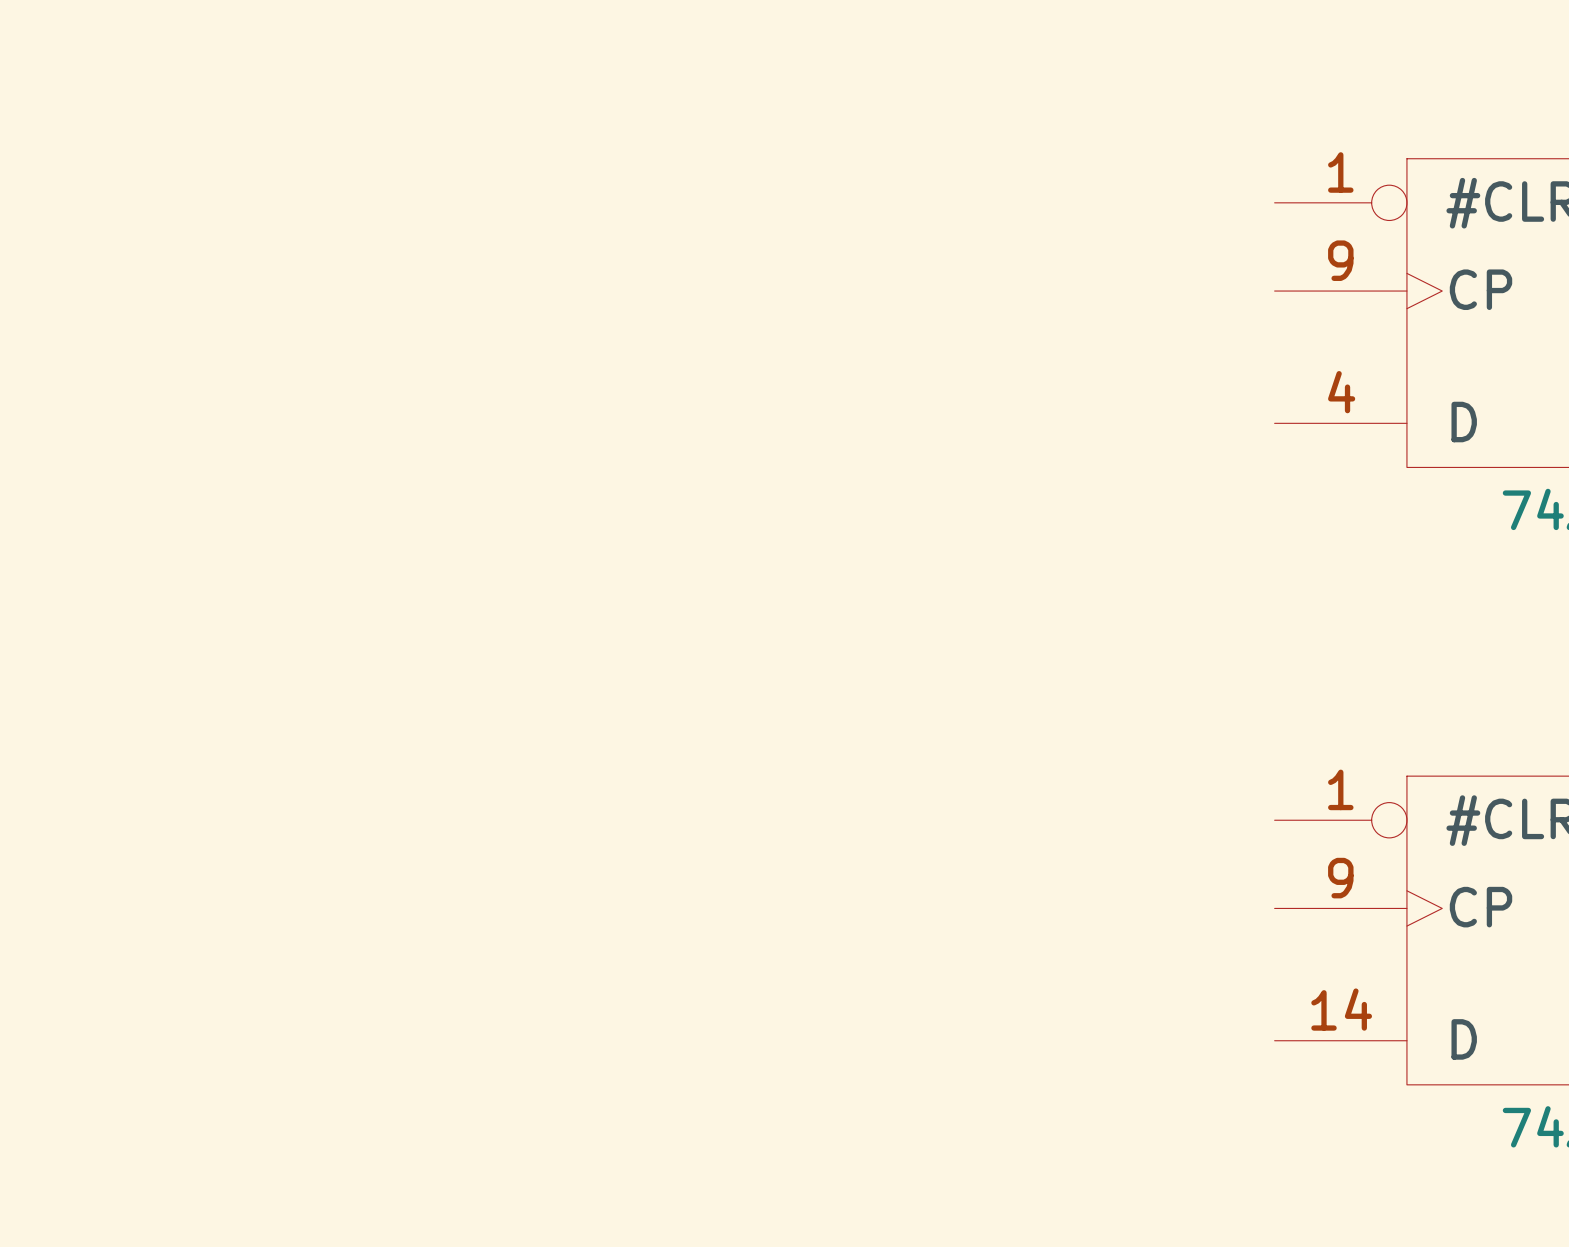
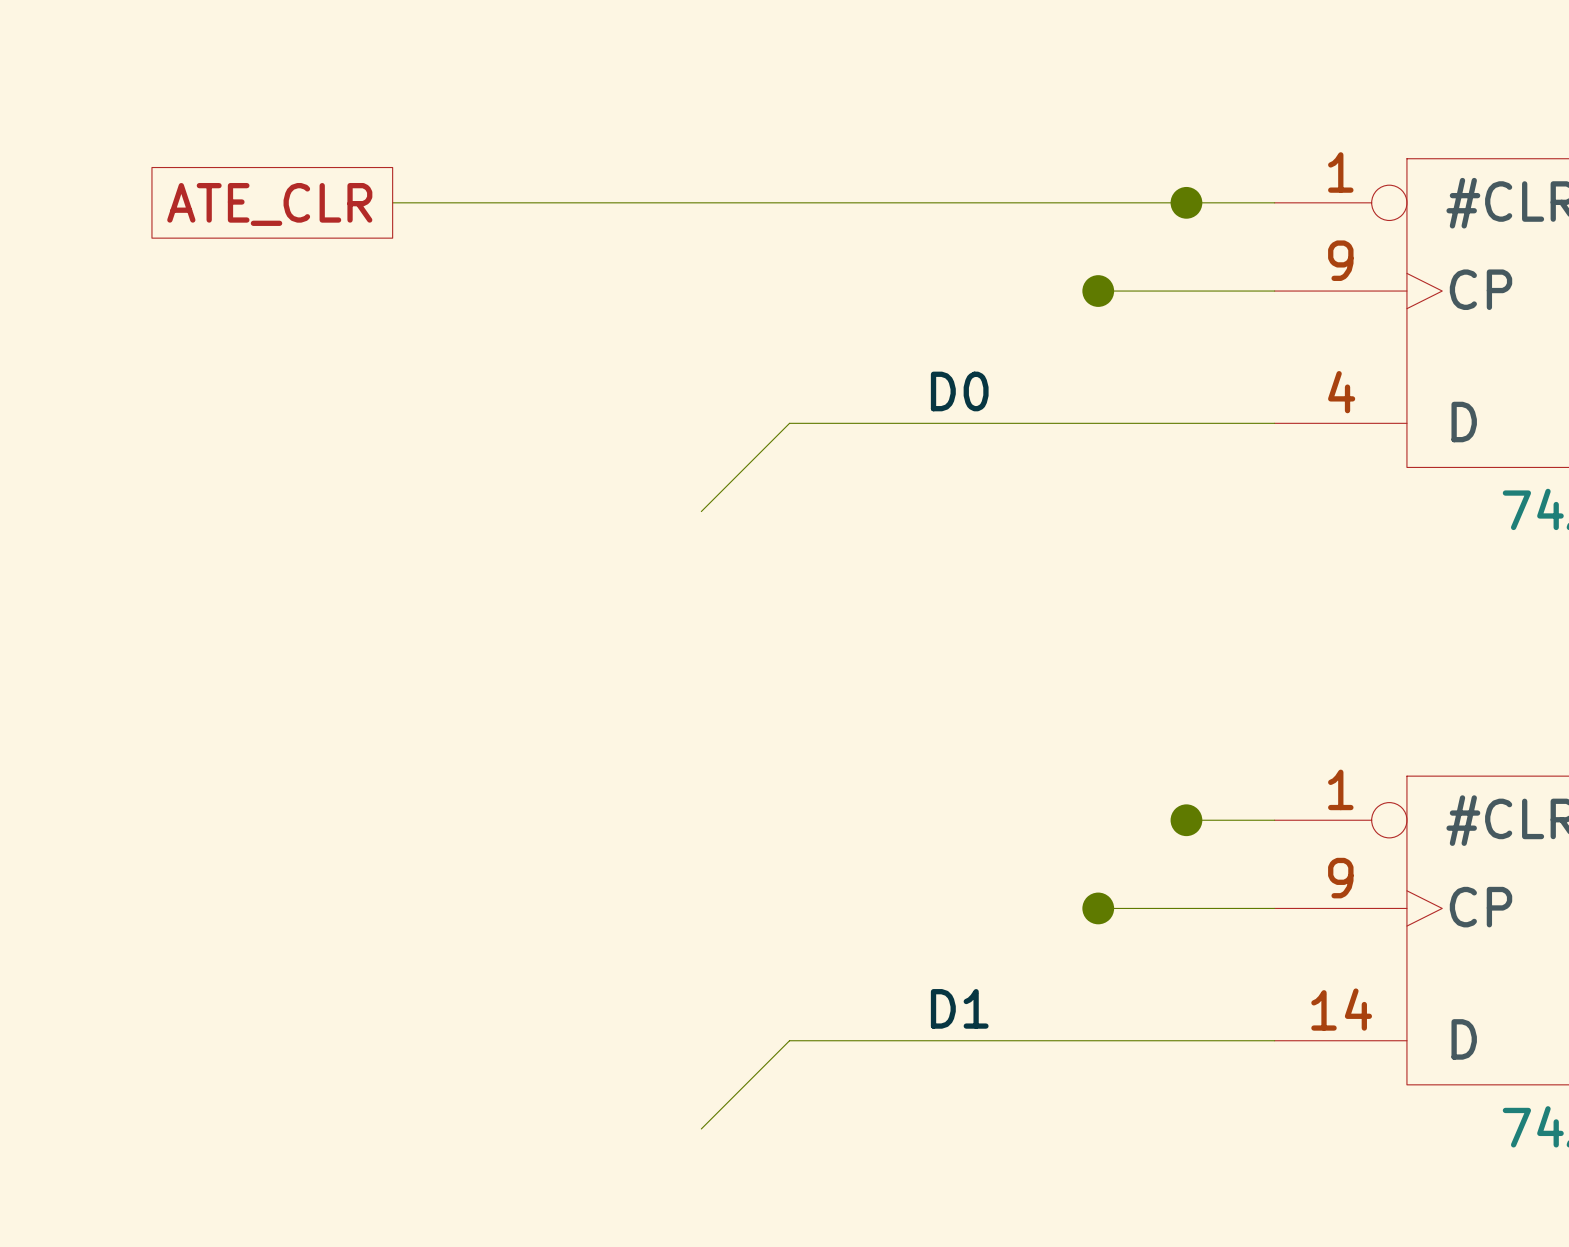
wire: none -> (392, 202) (1274, 202)
junction: none -> (1186, 202)
global label: none -> ATE_CLR (269, 204)
wire: none -> (1098, 291) (1274, 291)
junction: none -> (1098, 291)
label: none -> D0 (959, 391)
wire: none -> (1274, 423) (789, 423) (701, 511)
wire: none -> (1186, 820) (1274, 820)
junction: none -> (1186, 820)
wire: none -> (1098, 908) (1274, 908)
junction: none -> (1098, 908)
label: none -> D1 (959, 1008)
wire: none -> (1274, 1040) (789, 1040) (701, 1128)

